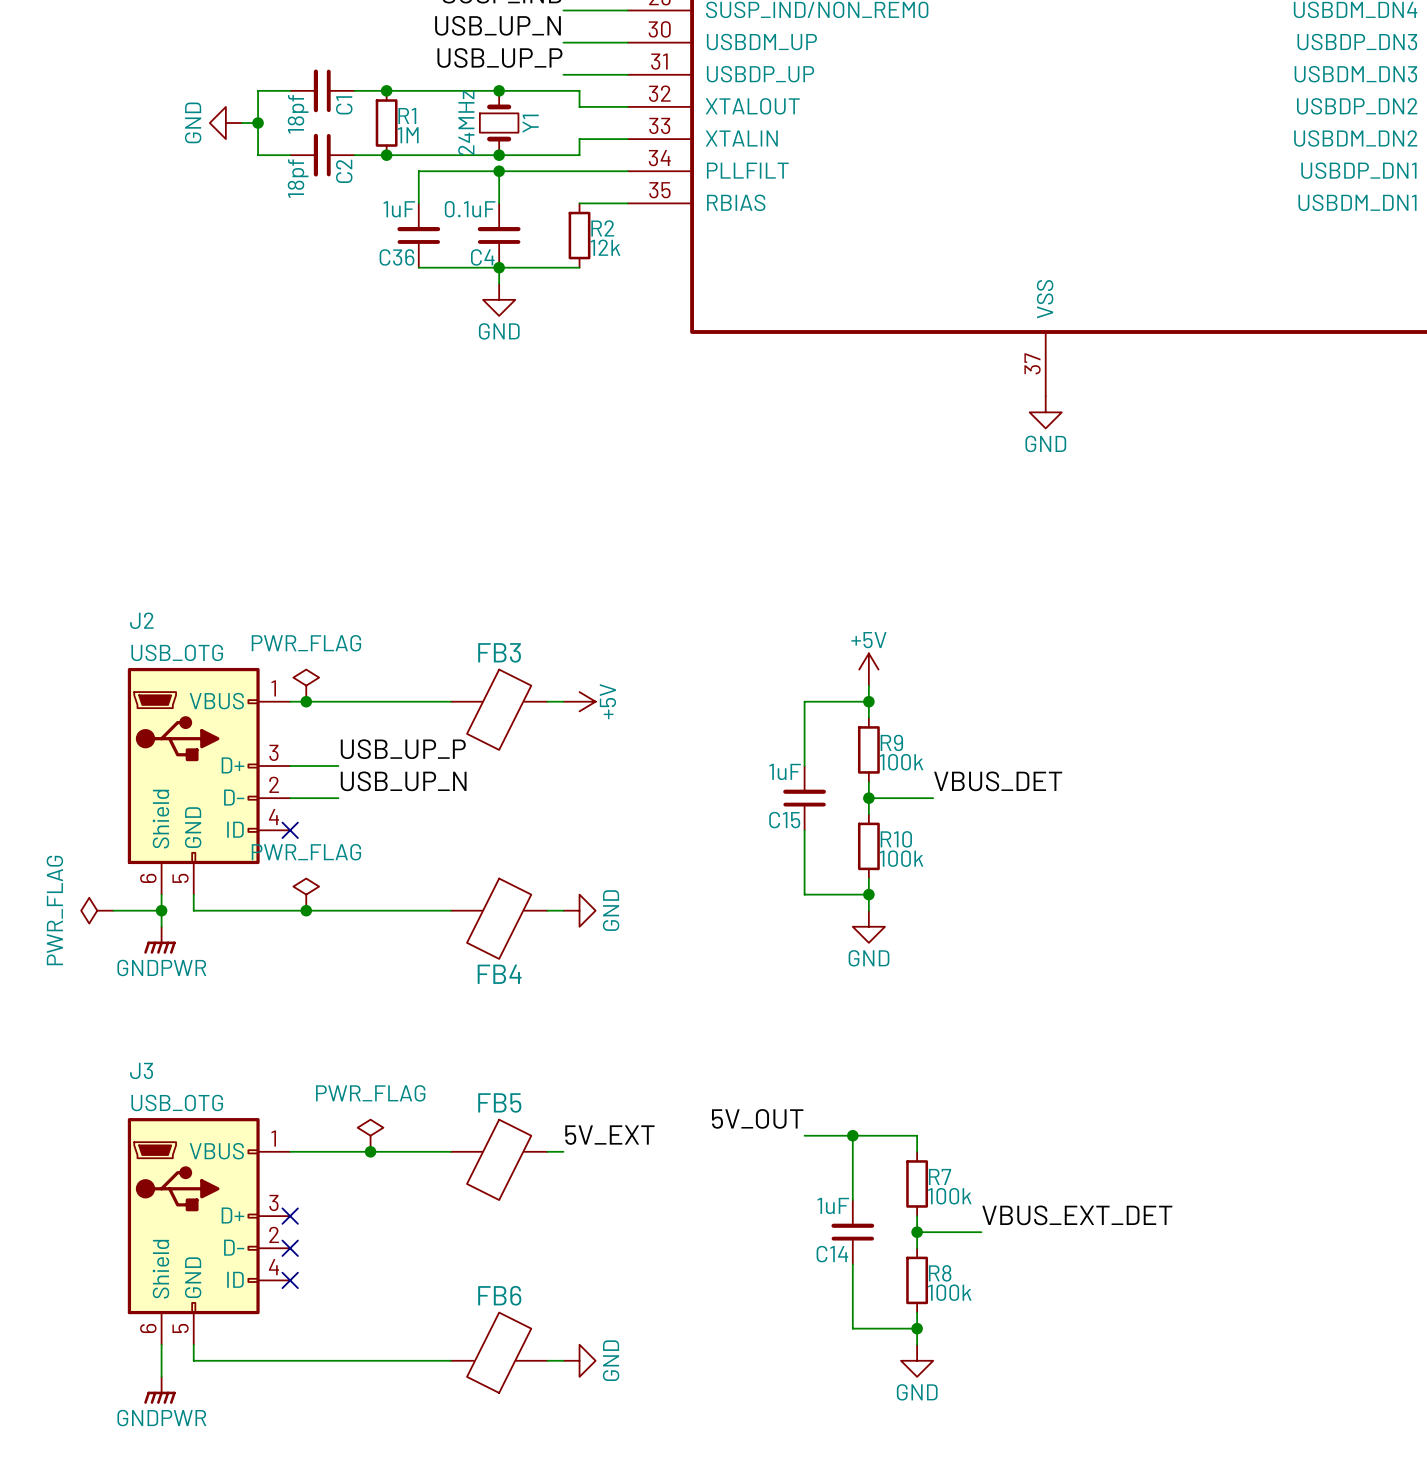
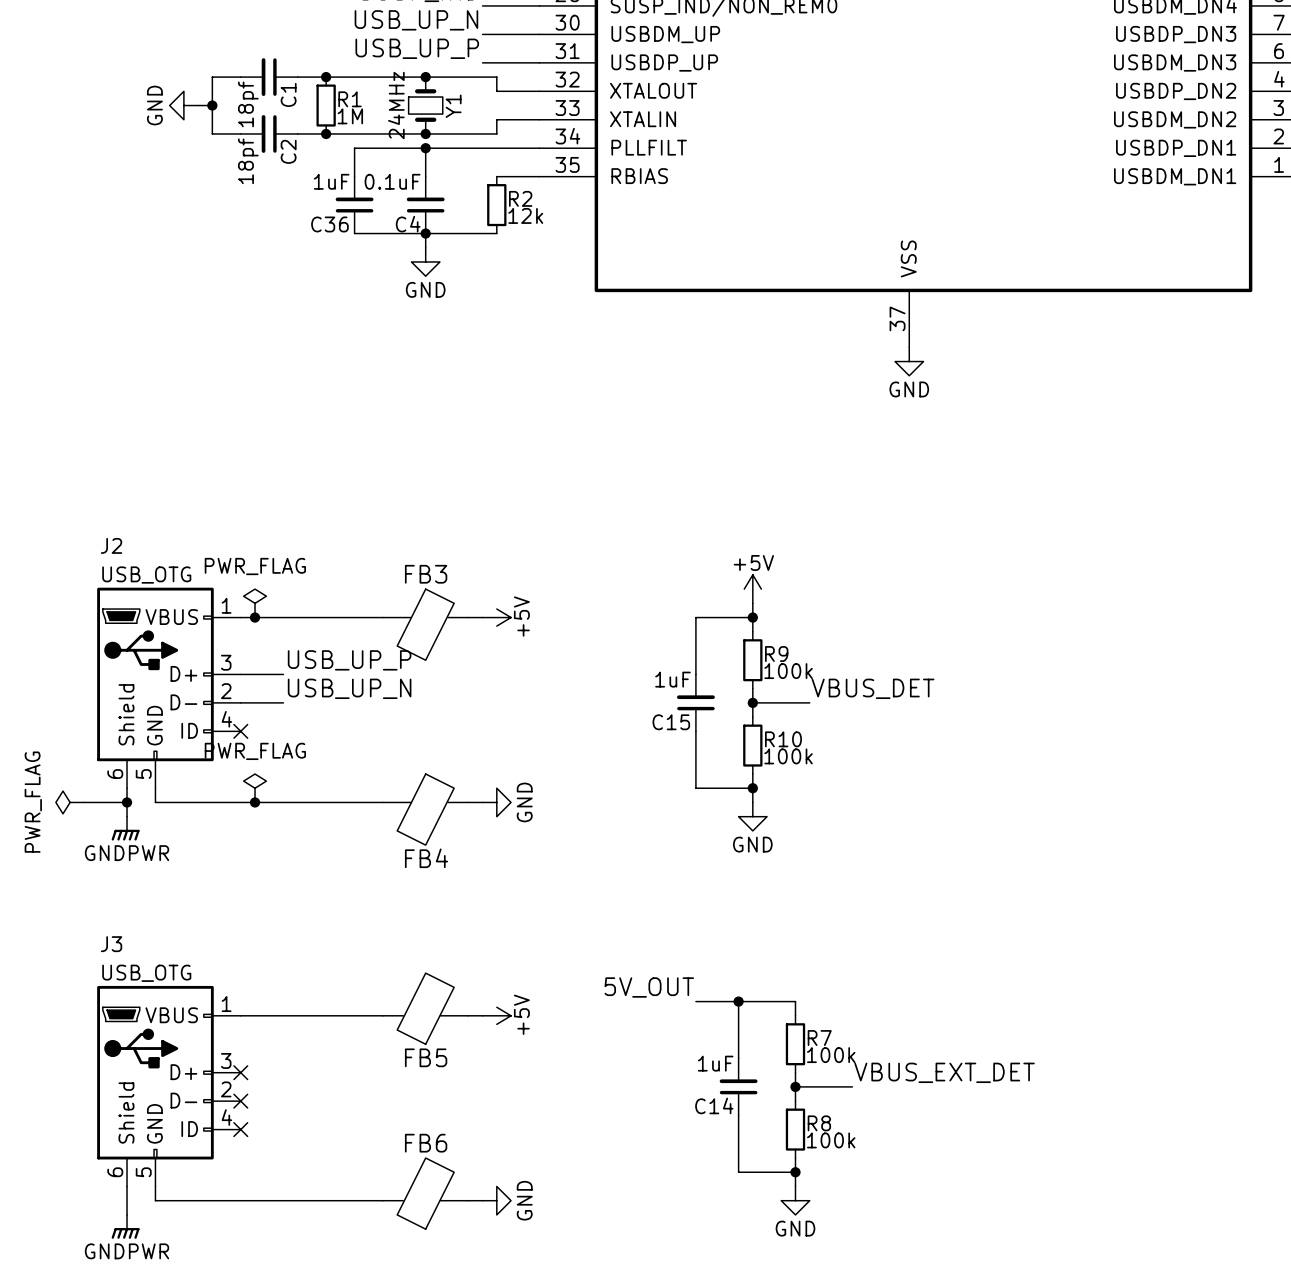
power symbol: PWR_FLAG (370, 1135) -> none
label: 5V_EXT (609, 1135) -> none
junction: (370, 1151) -> none
power symbol: none -> +5V (496, 1015)
FB5 rotation: 0° (499, 1159) -> 180° (425, 1008)

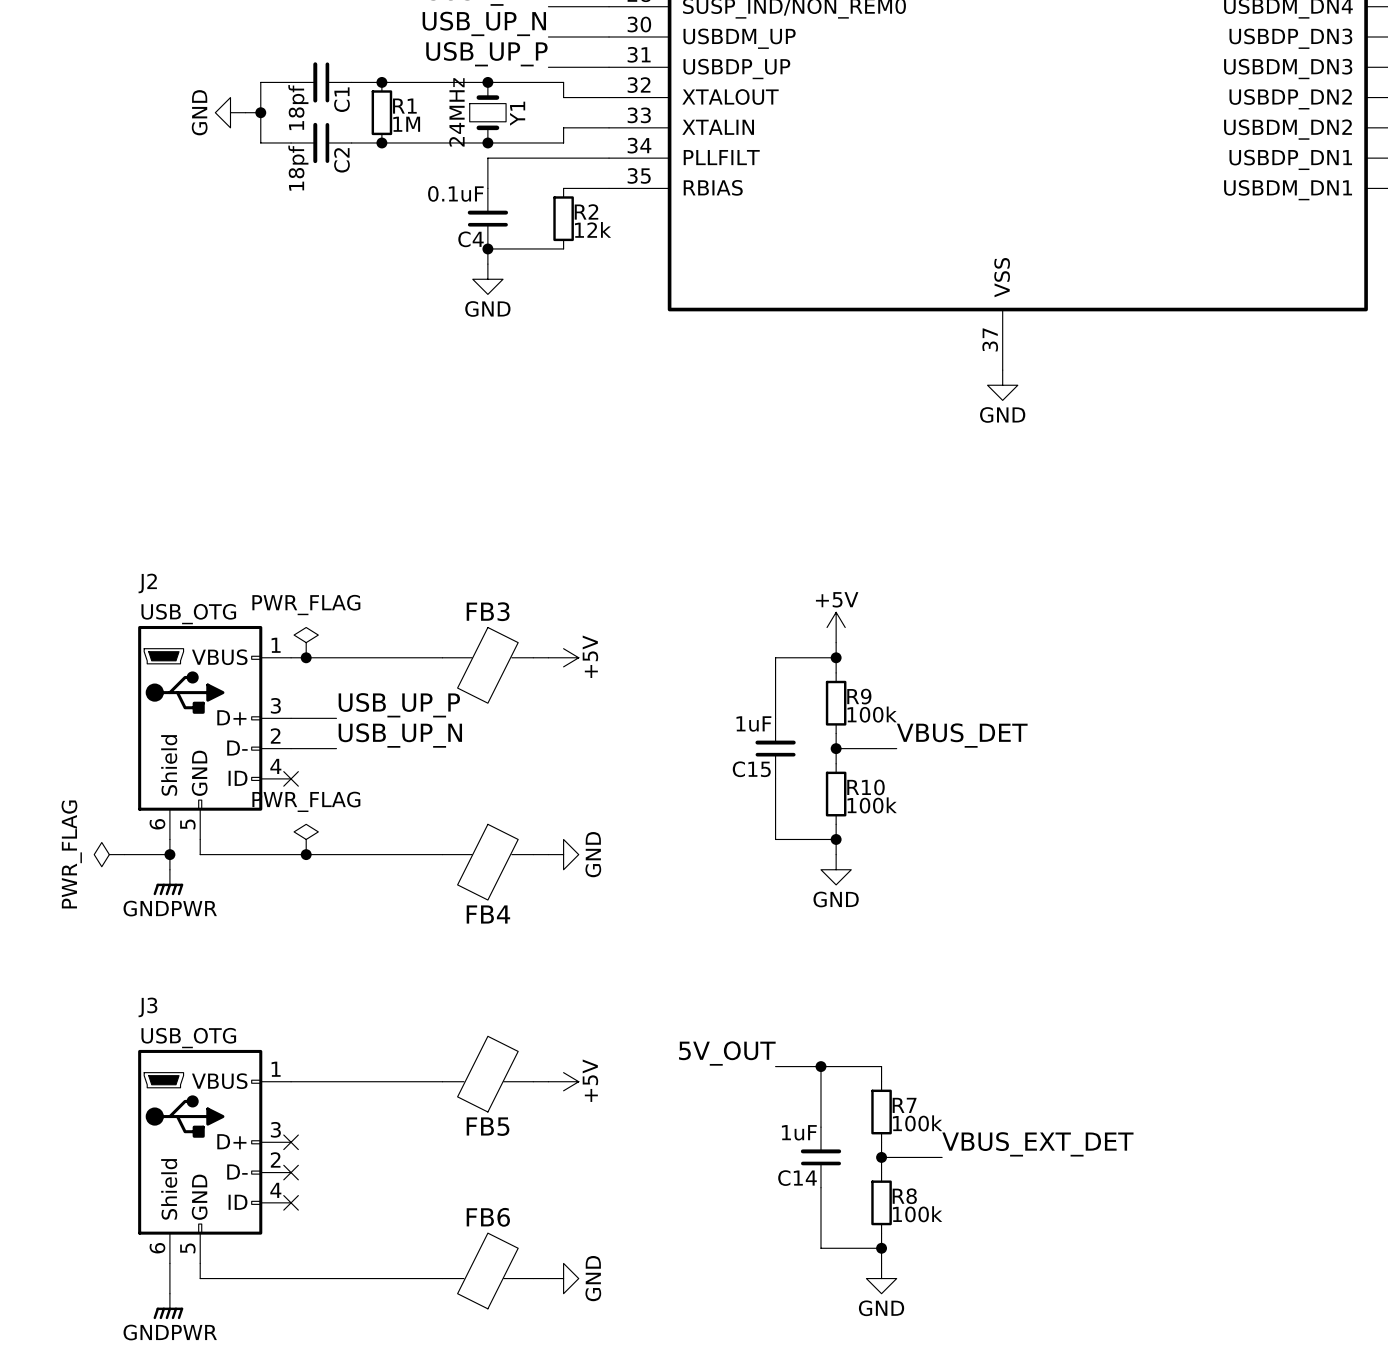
wire: (425, 148) (354, 148) (354, 176) -> none
junction: (425, 148) -> none
C36: 1uF (354, 205) -> none
wire: (354, 233) (425, 233) -> none

